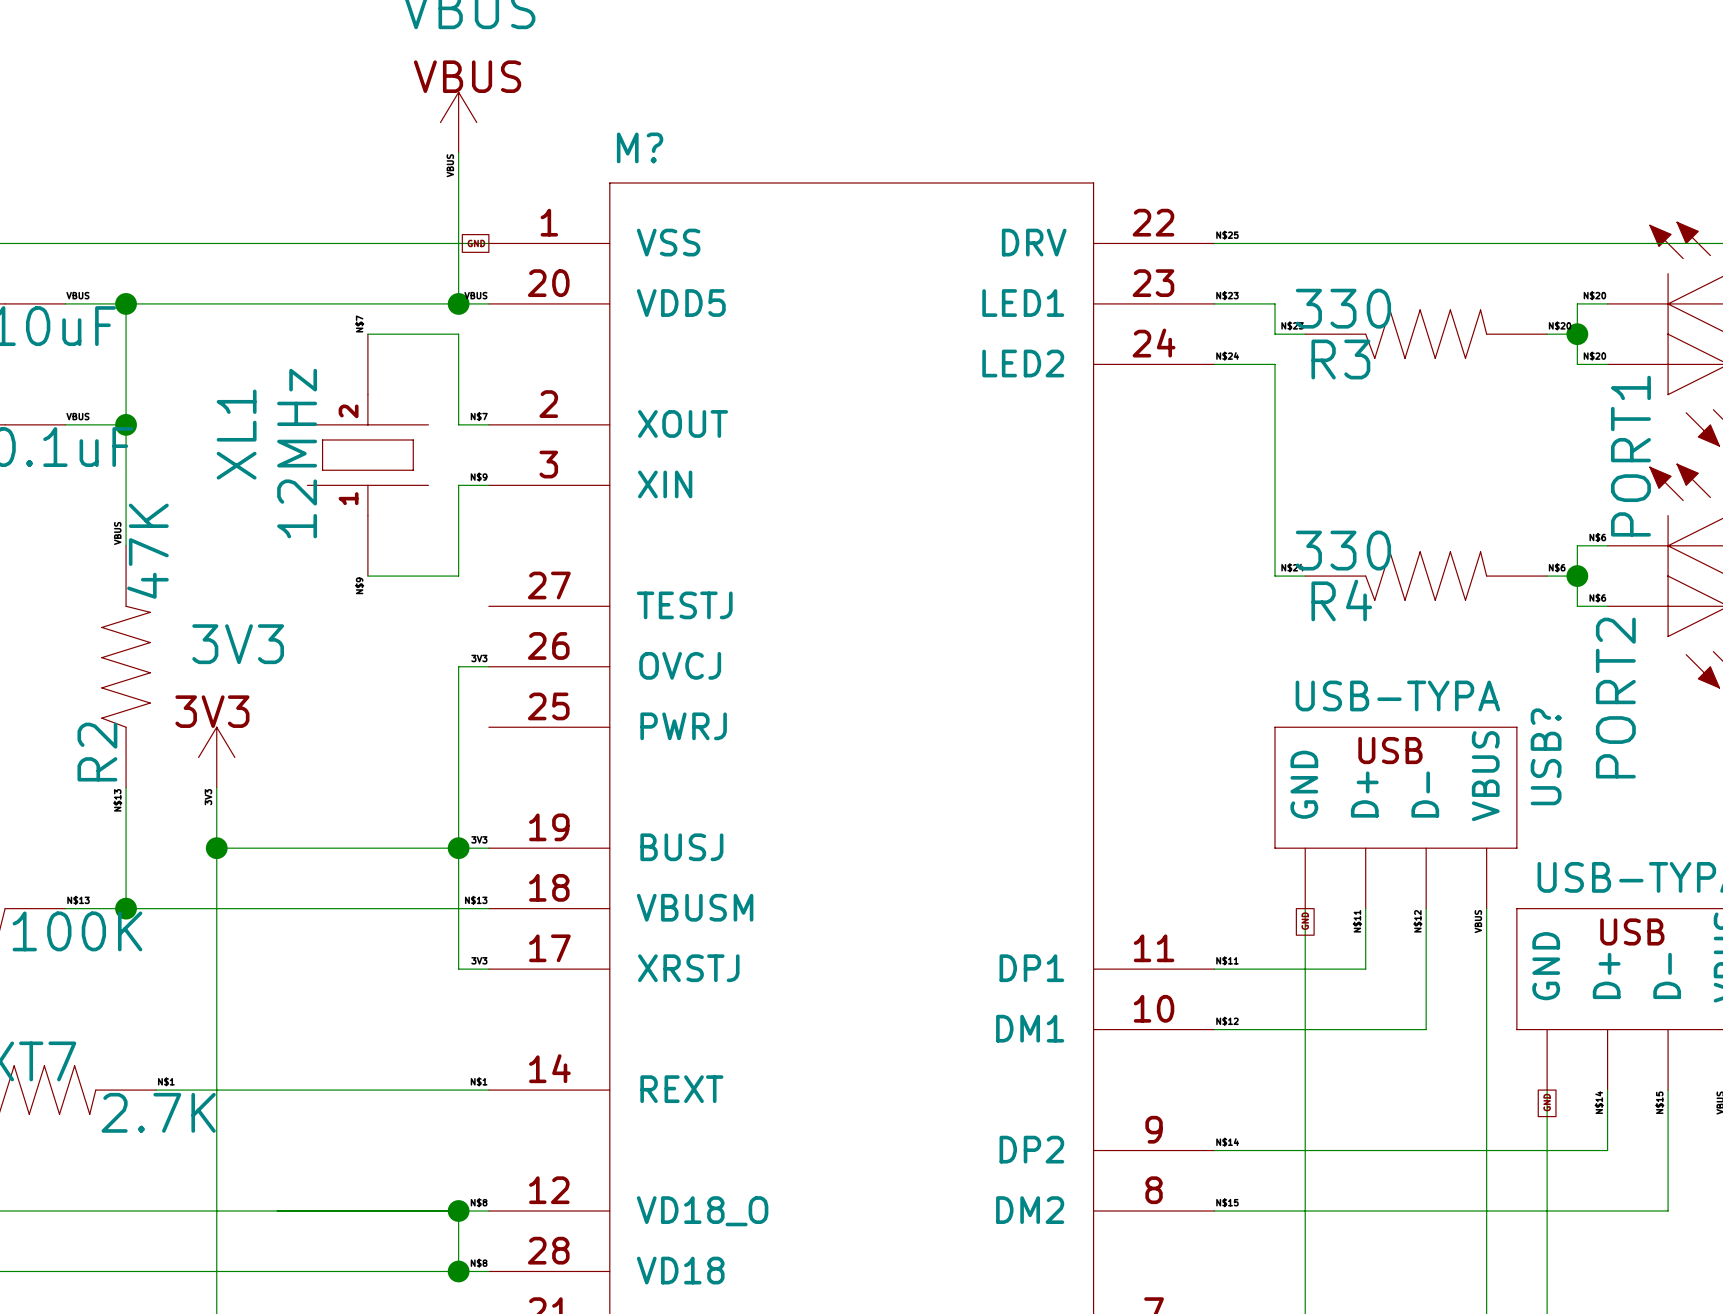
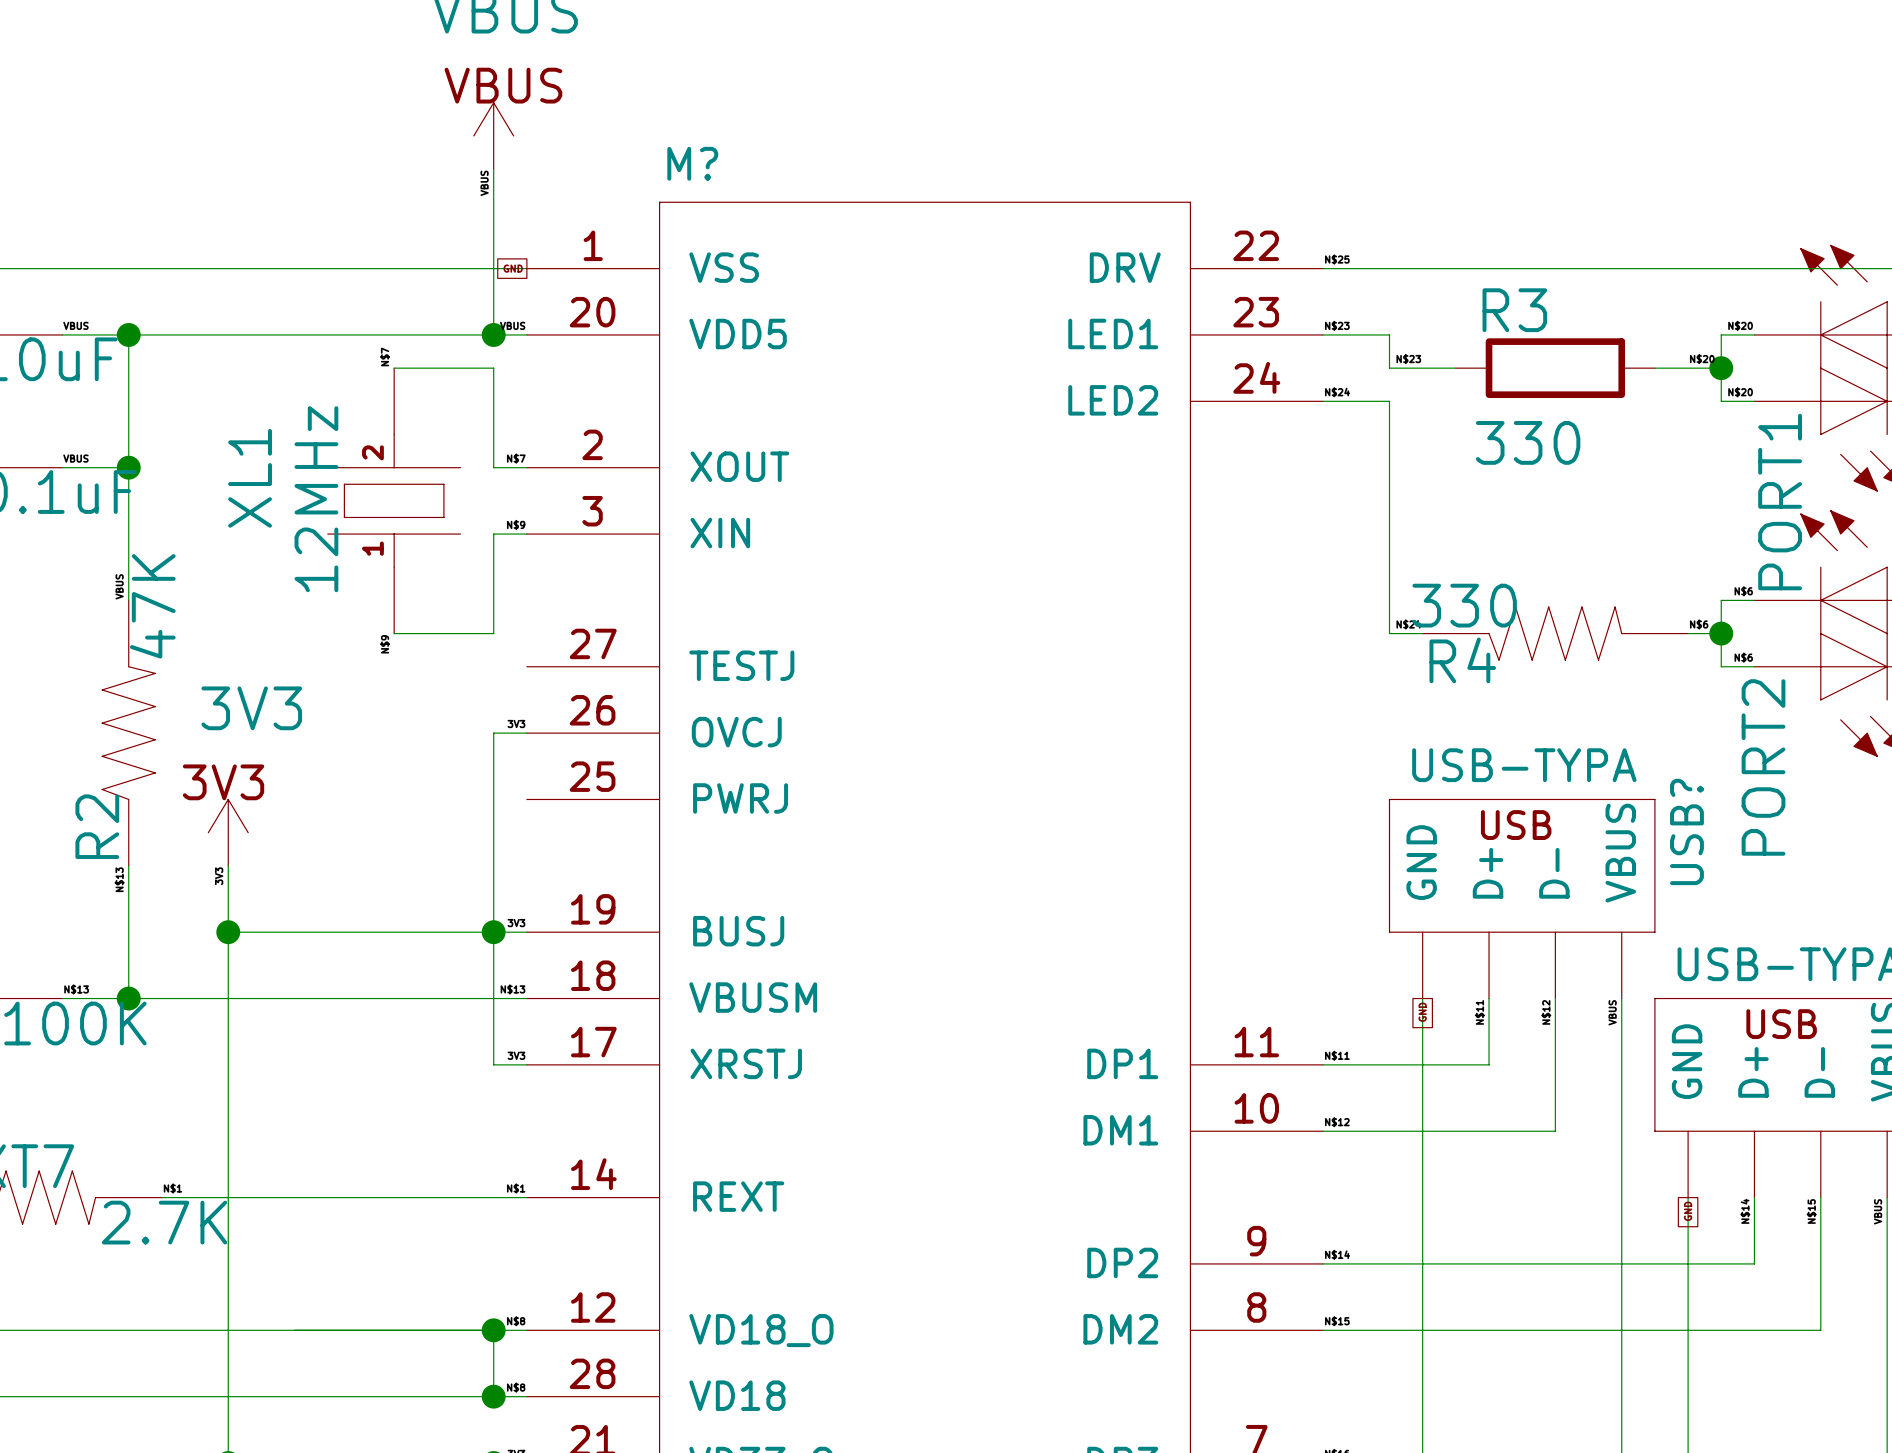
R3 value position: 330 (1343, 308) -> 330 (1528, 442)
R3 symbol: [1305, 309, 1548, 359] -> [1455, 338, 1655, 399]
R3 name position: R3 (1340, 359) -> R3 (1514, 310)

